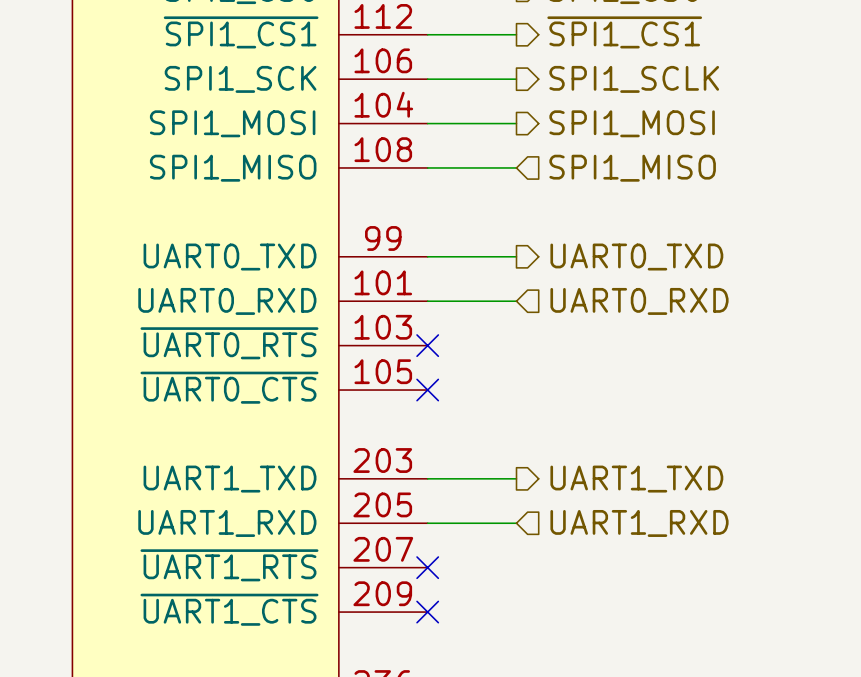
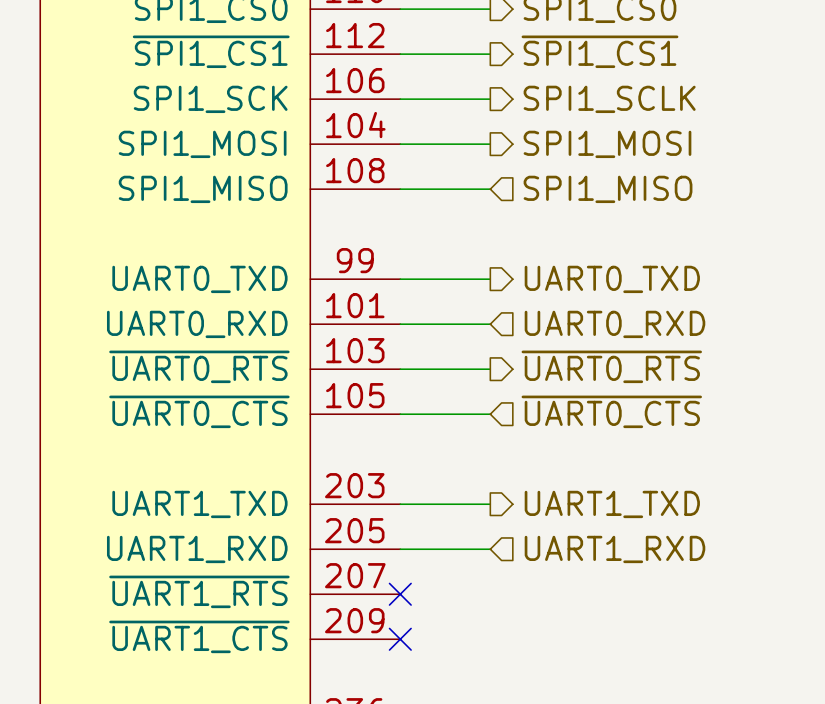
hierarchical label: none -> ~{UART0_RTS} (611, 366)
wire: none -> (400, 369) (490, 369)
no-connect mark: (427, 345) -> none
hierarchical label: none -> ~{UART0_CTS} (611, 411)
wire: none -> (400, 414) (490, 414)
no-connect mark: (427, 390) -> none

